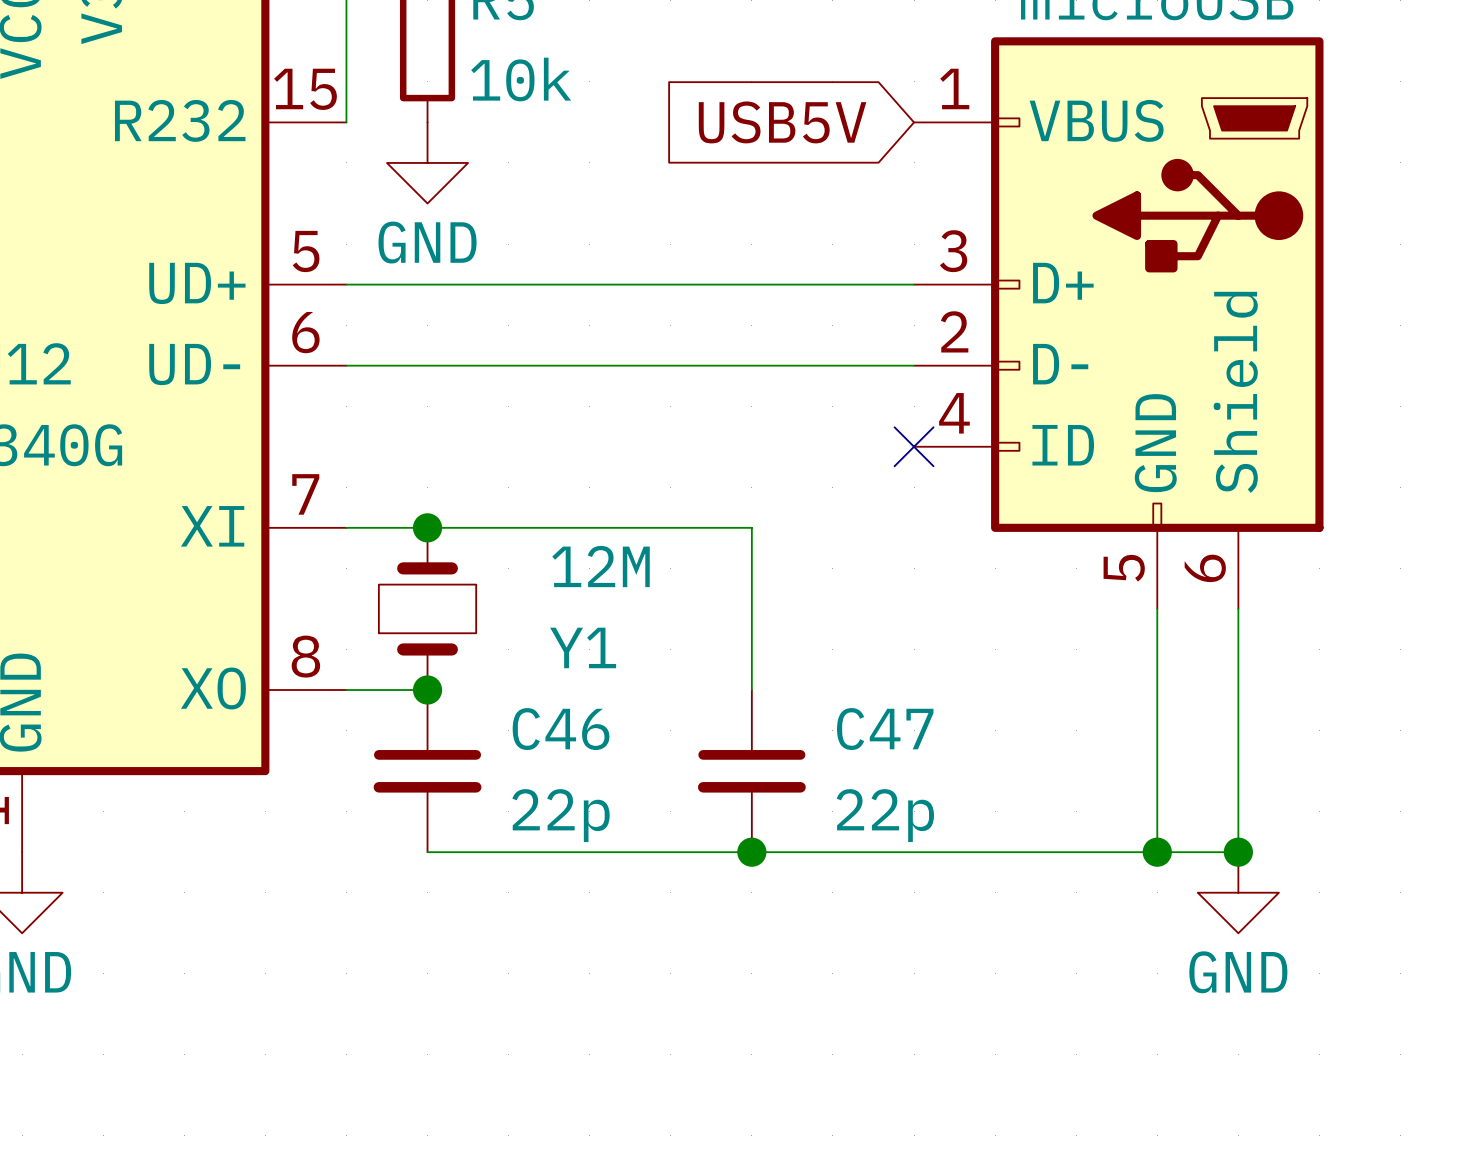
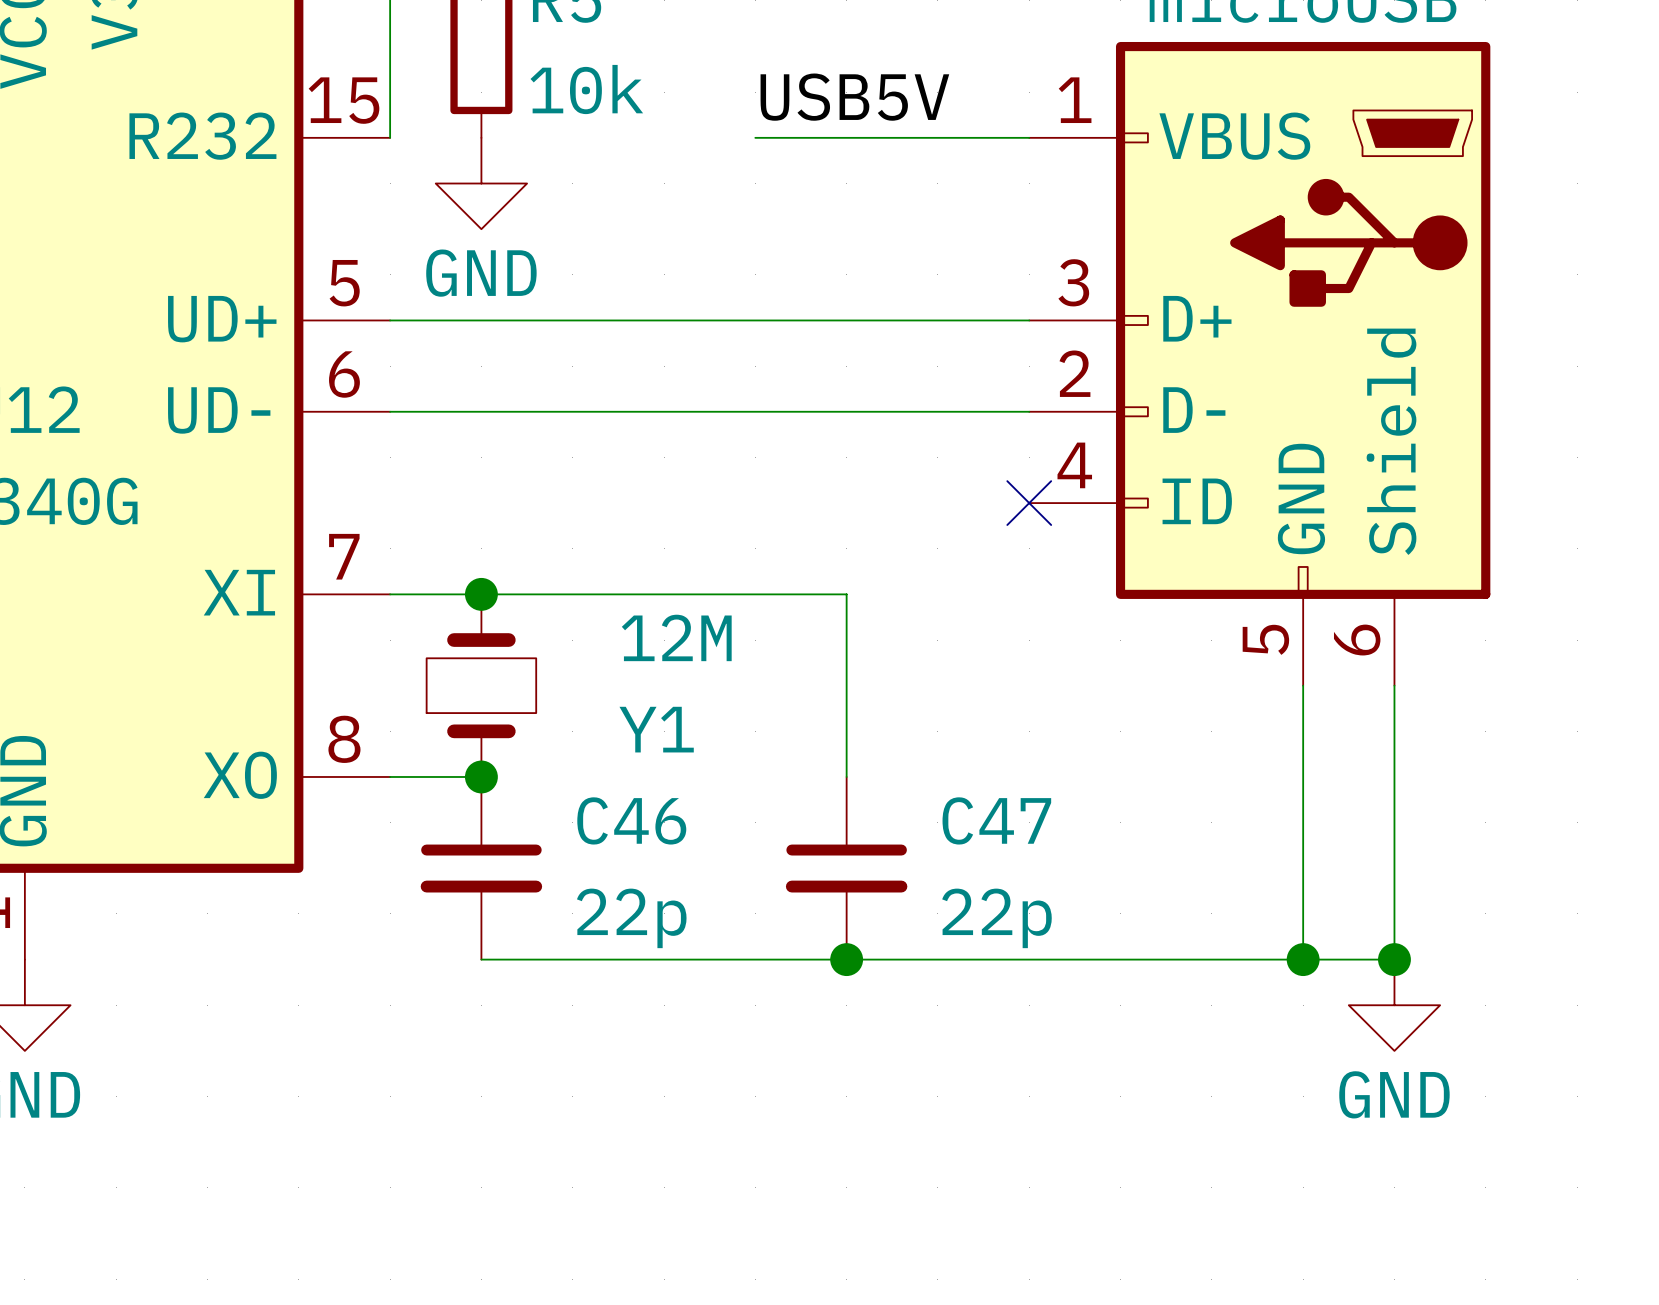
label: none -> USB5V (854, 97)
wire: none -> (755, 137) (1029, 137)
global label: USB5V (782, 122) -> none

